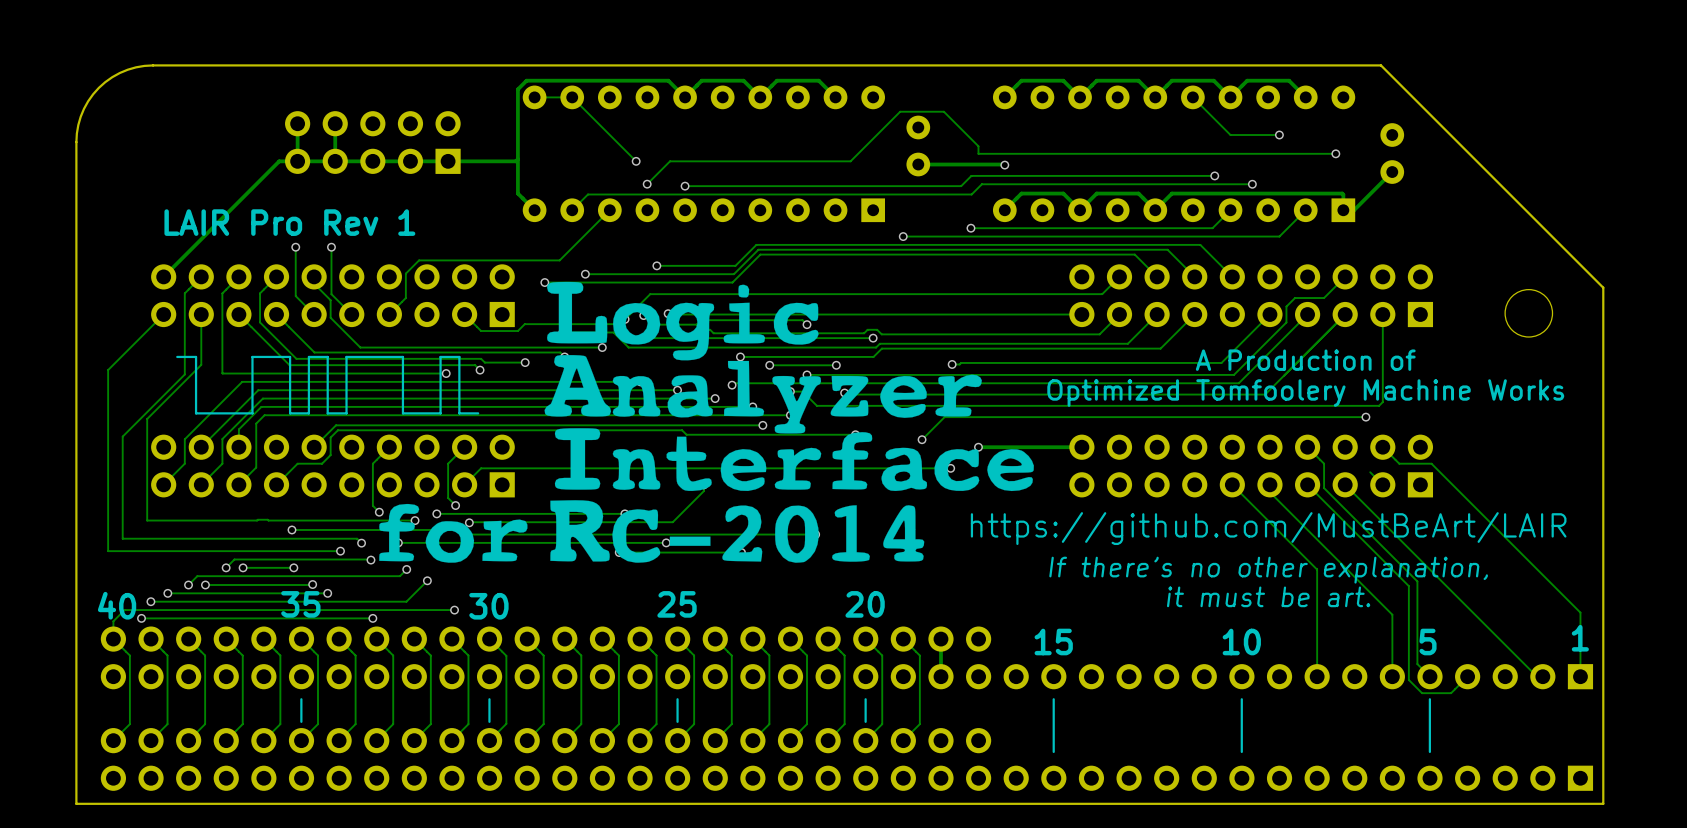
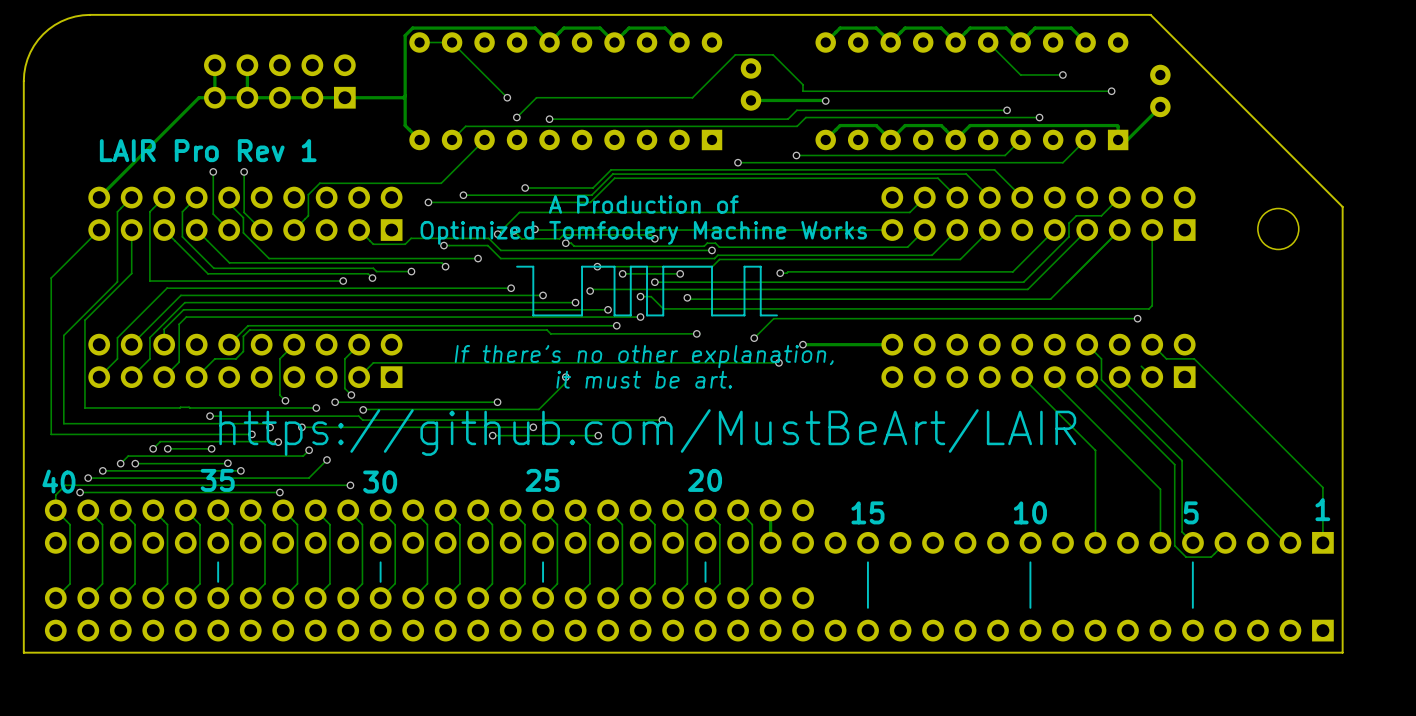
drawing: [379, 281, 1034, 563] -> none
text: none -> A Production of (643, 204)
text: none -> Optimized Tomfoolery Machine Works (643, 232)
line: (177, 356) (196, 356) (196, 413) (252, 413) (252, 356) (290, 356) (290, 413) (308, 413) (308, 356) (327, 356) (327, 413) (346, 413) (346, 356) (402, 356) (402, 413) (440, 413) (440, 356) (459, 356) (459, 413) (478, 413) -> none
line: none -> (517, 266) (533, 266) (533, 315) (582, 315) (582, 266) (614, 266) (614, 315) (630, 315) (630, 266) (647, 266) (647, 315) (663, 315) (663, 266) (712, 266) (712, 315) (744, 315) (744, 266) (760, 266) (760, 315) (776, 315)
text: A Production of (1305, 360) -> none
text: Optimized Tomfoolery Machine Works (1305, 393) -> none
text: none -> If there’s no other explanation, (644, 356)
text: none -> it must be art. (644, 379)
text: https://github.com/MustBeArt/LAIR (1268, 528) -> none
text: none -> https://github.com/MustBeArt/LAIR (647, 432)
text: If there’s no other explanation, (1268, 570) -> none
text: it must be art. (1268, 596) -> none

